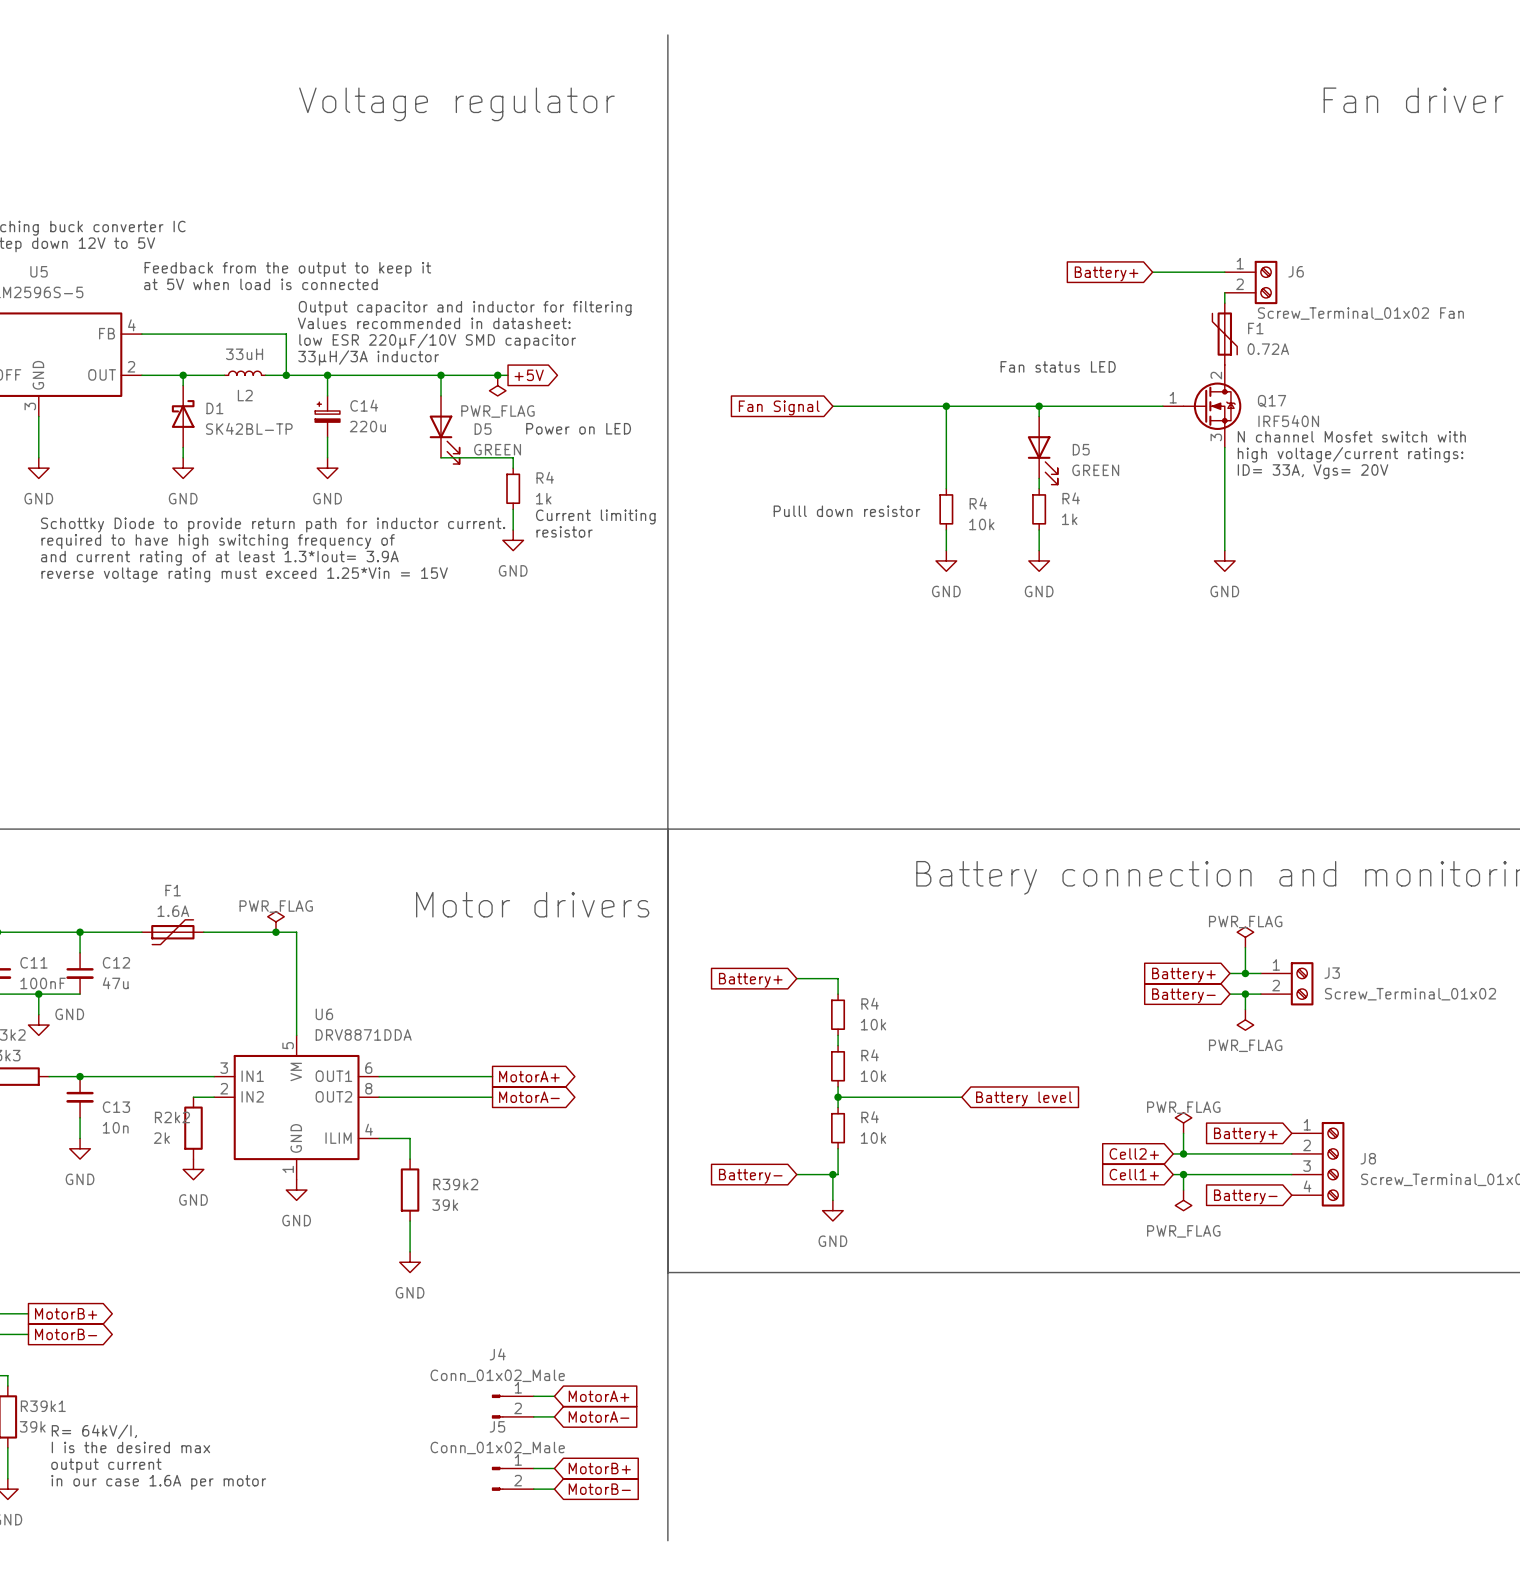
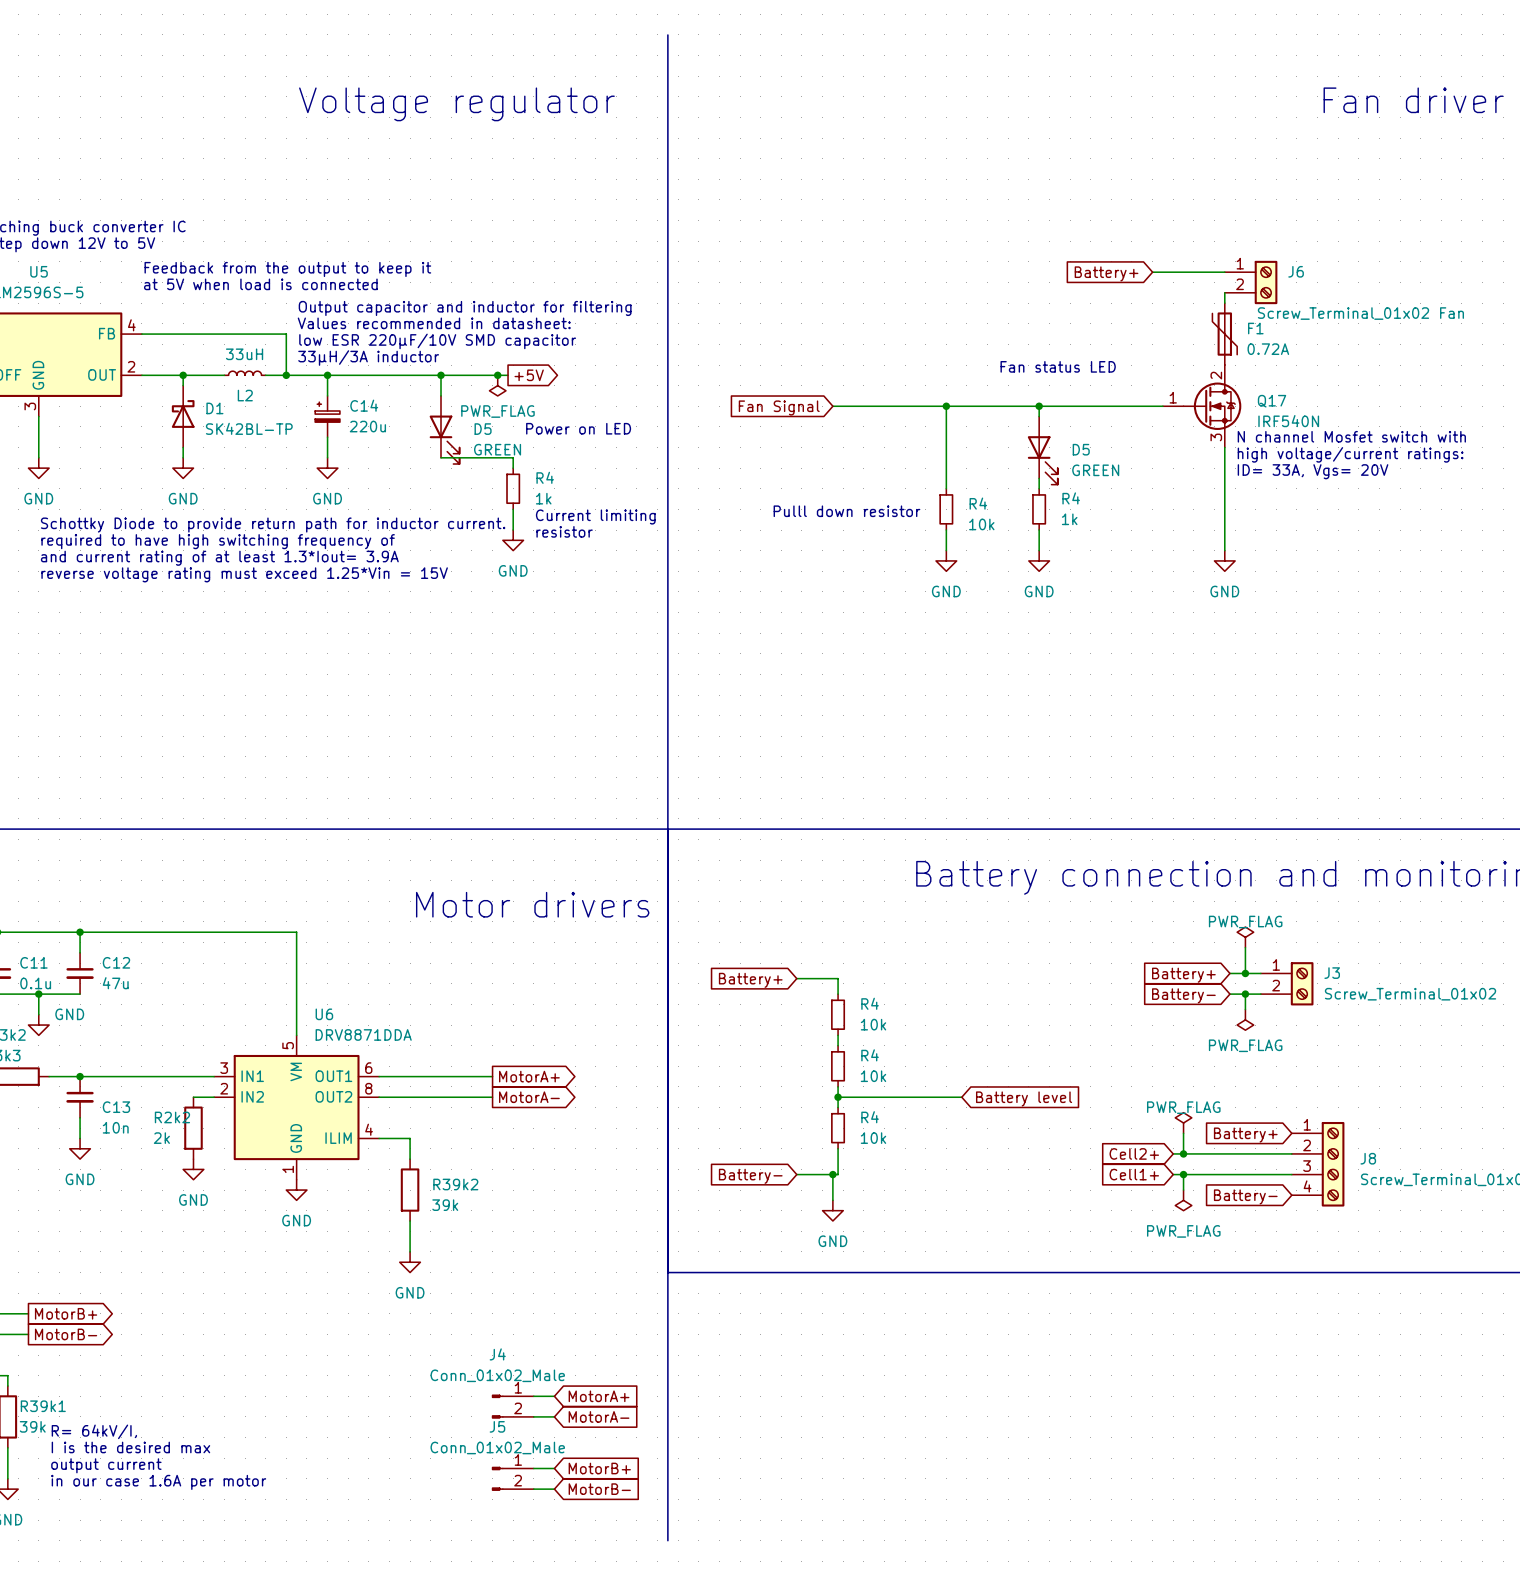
power symbol: PWR_FLAG (275, 921) -> none
F1: 1.6A (172, 932) -> none
junction: (275, 932) -> none
C11 value: 100nF (43, 983) -> 0.1u (35, 983)

